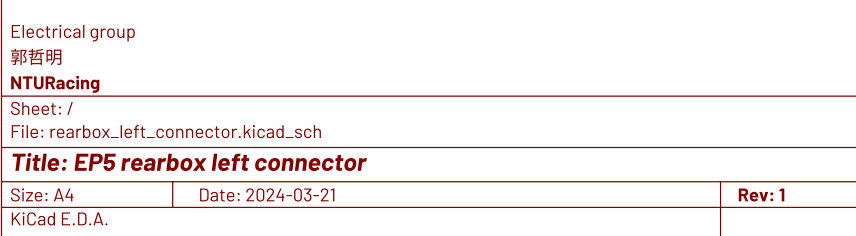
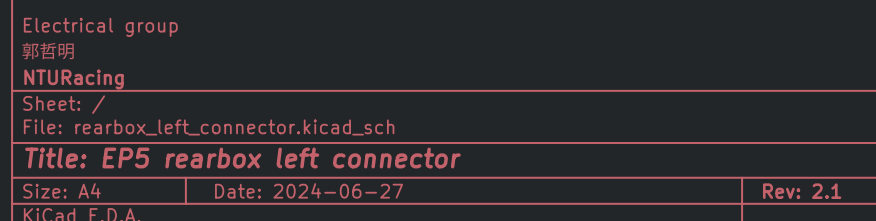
title block: Date: 2024-03-21 (267, 194) -> Date: 2024-06-27 (309, 190)
title block: Rev: 1 (761, 195) -> Rev: 2.1 (802, 191)

